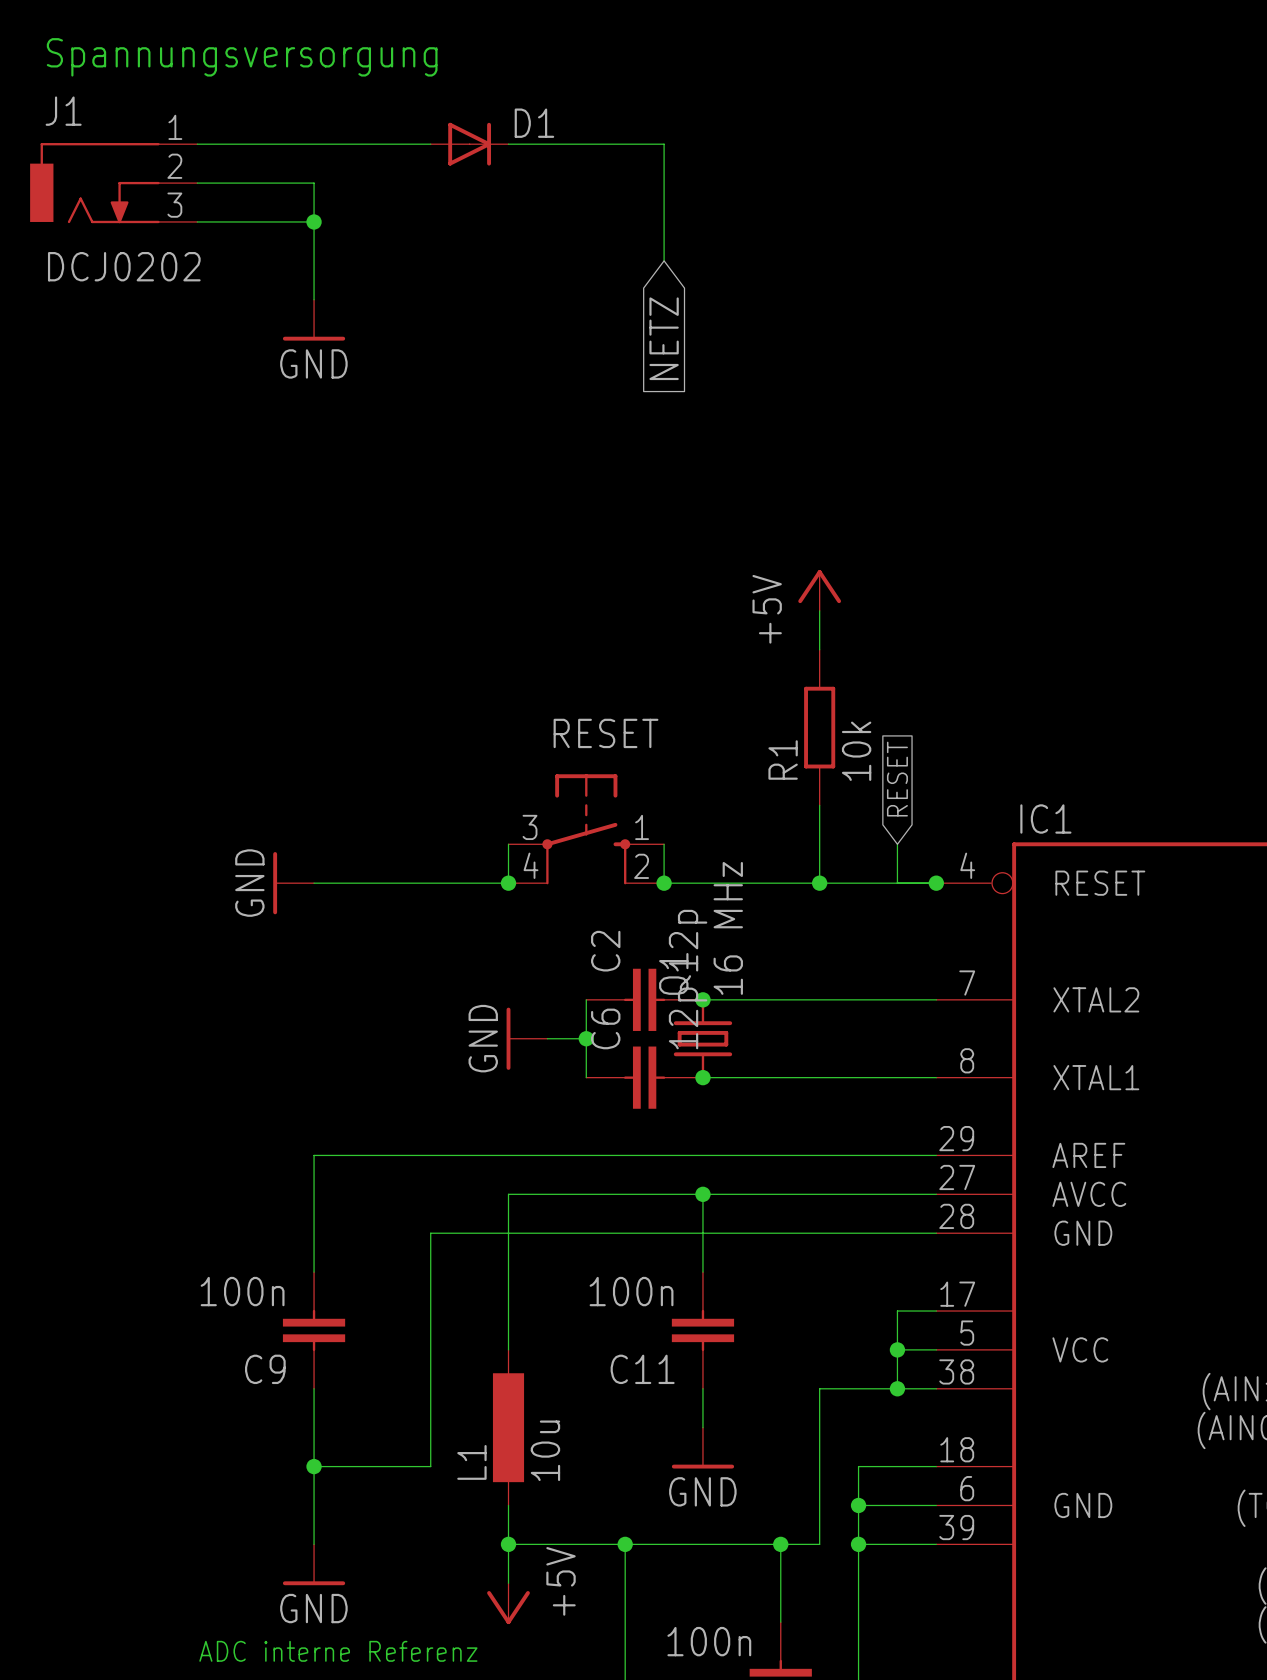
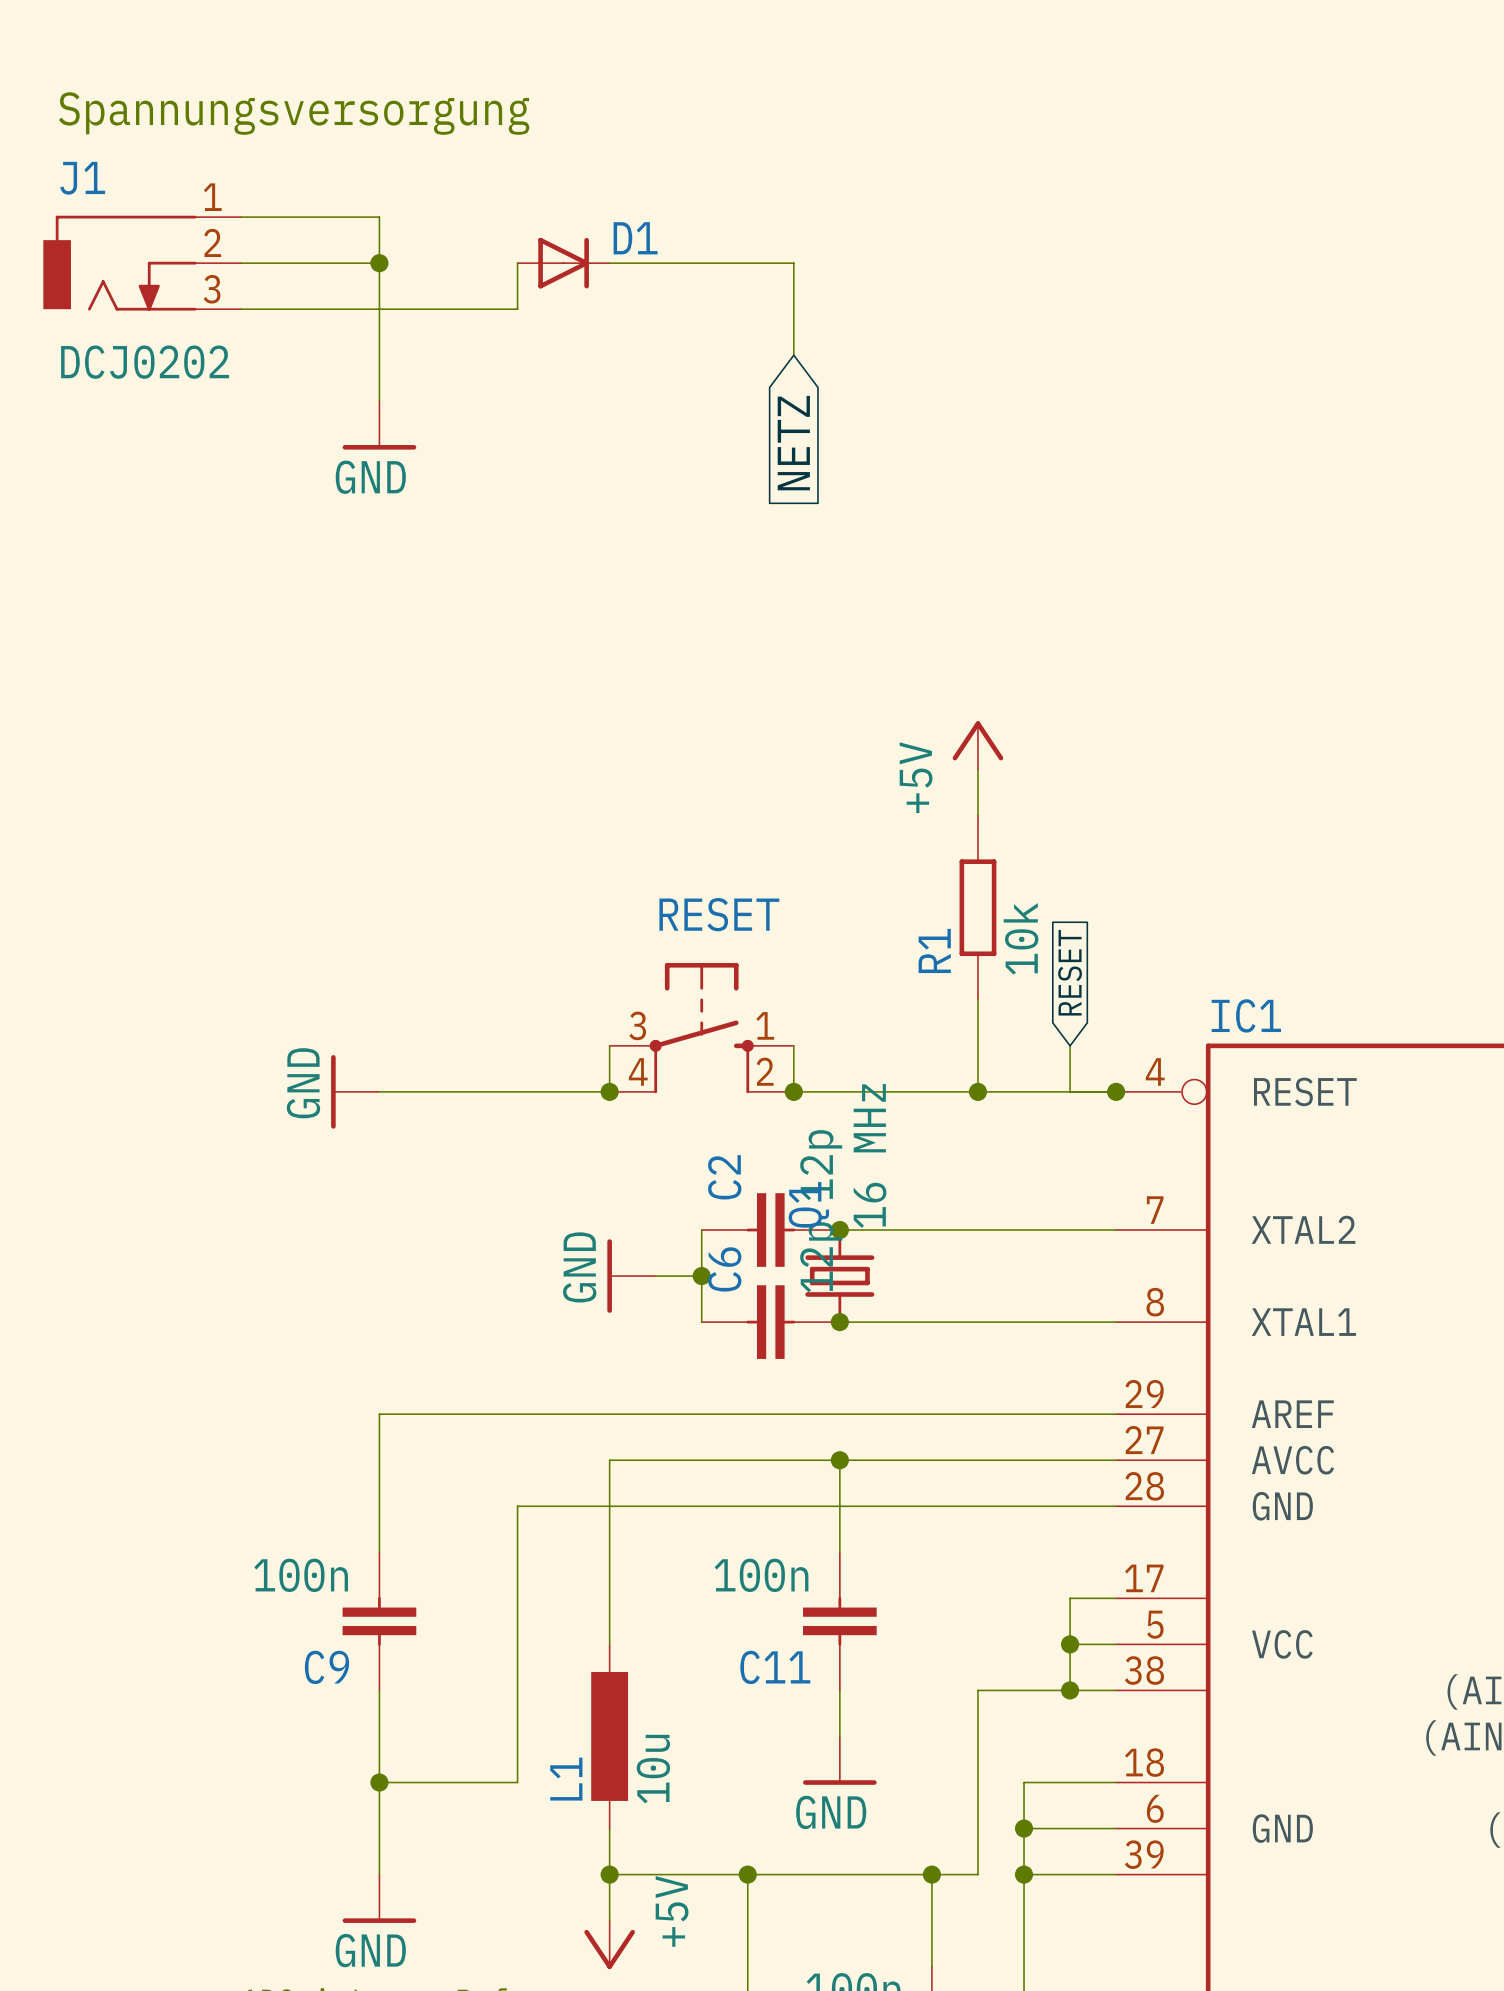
wire: (314, 144) (430, 144) -> (379, 217) (379, 263)
D1 position: (469, 144) -> (563, 263)
wire: (508, 144) (664, 144) (664, 183) -> (609, 263) (793, 263)
wire: none -> (517, 263) (517, 309) (379, 309)
junction position: (314, 221) -> (379, 263)

